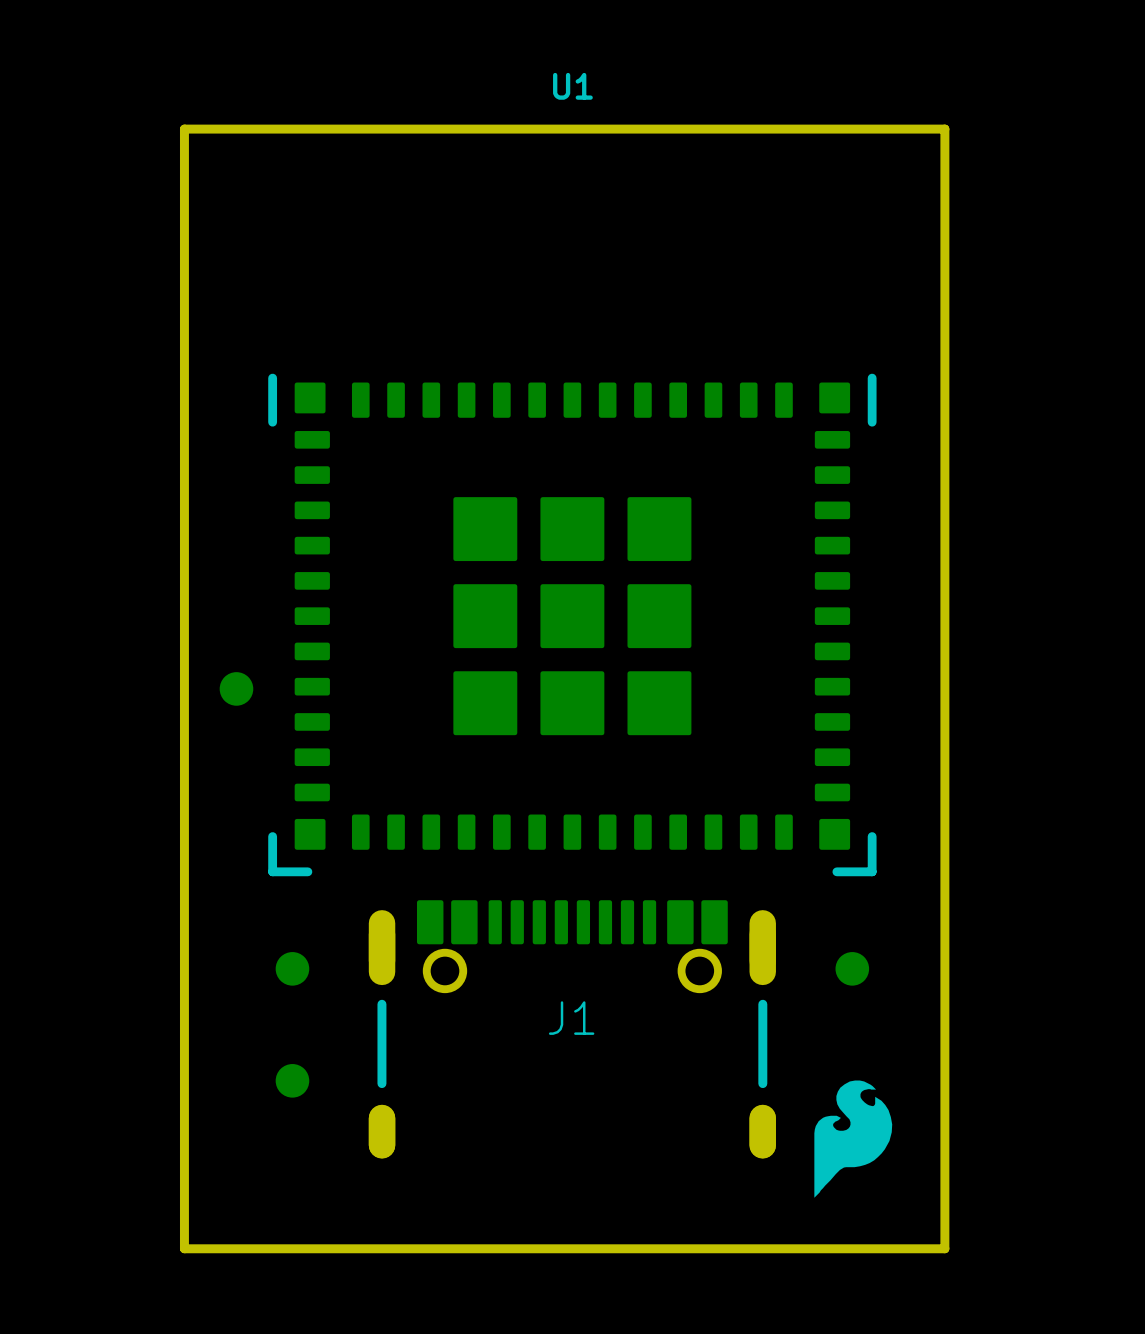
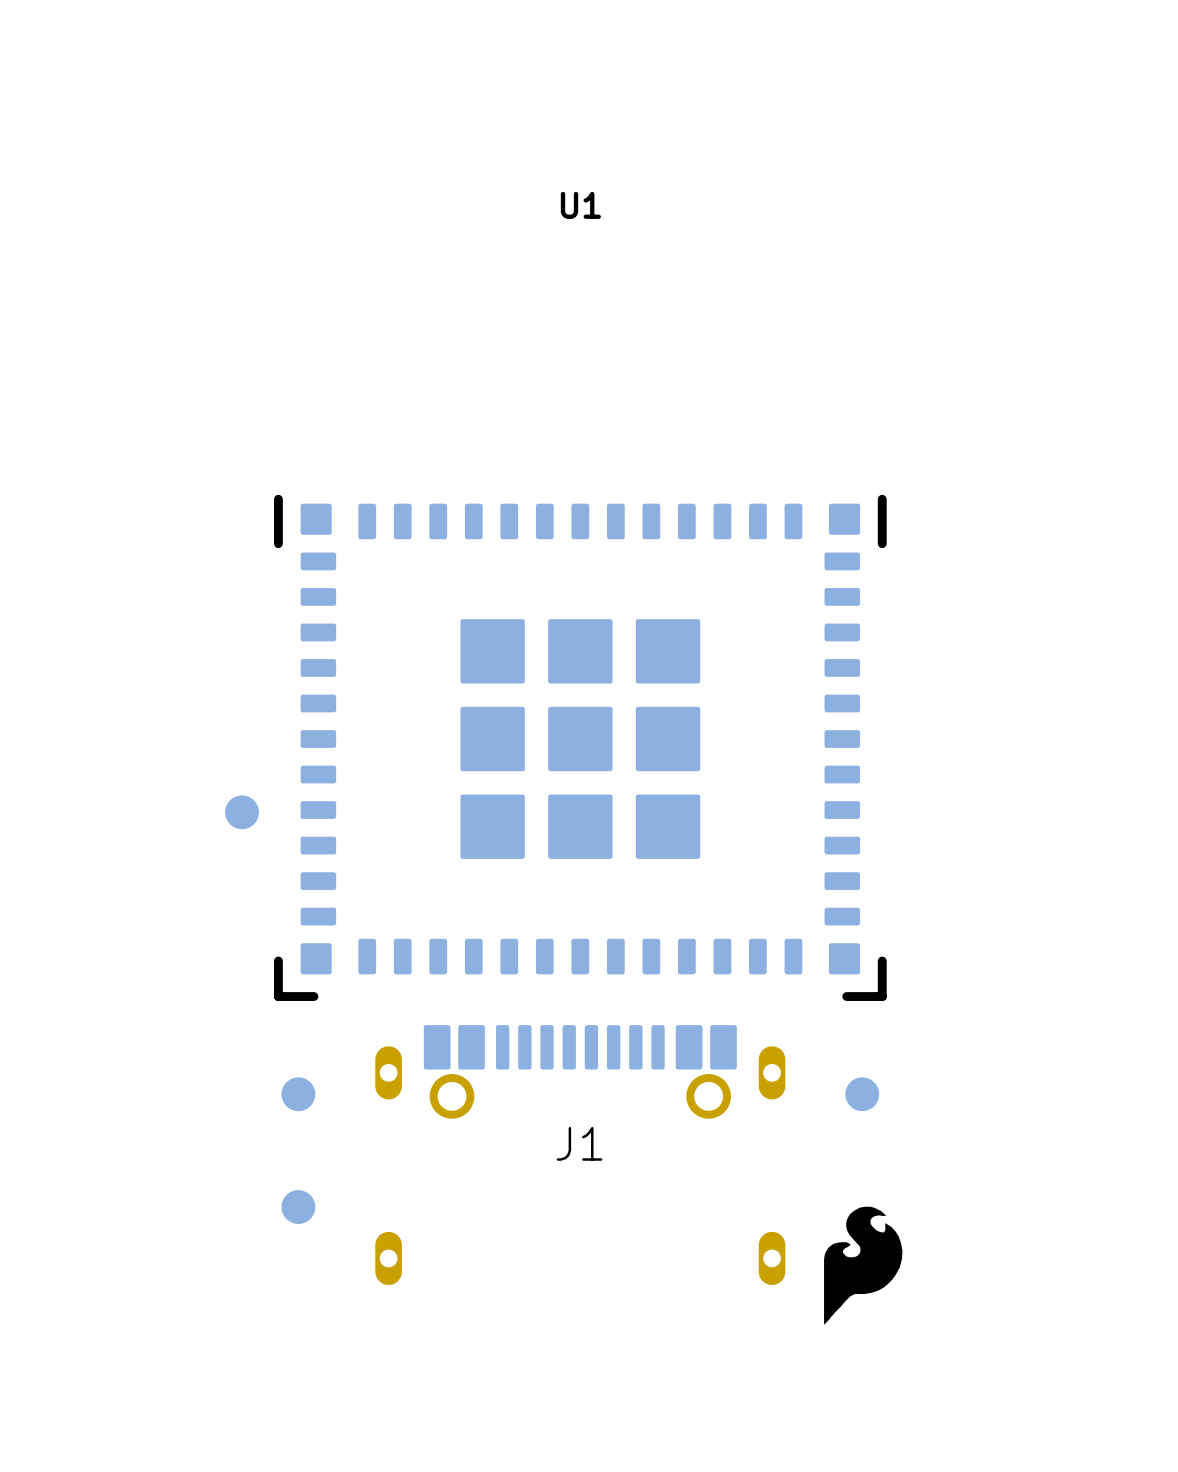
board edge: (944, 129) (944, 1248) (184, 1248) (184, 129) (944, 129) -> none
J1 footprint: [368, 900, 776, 1159] -> [375, 1025, 786, 1286]

